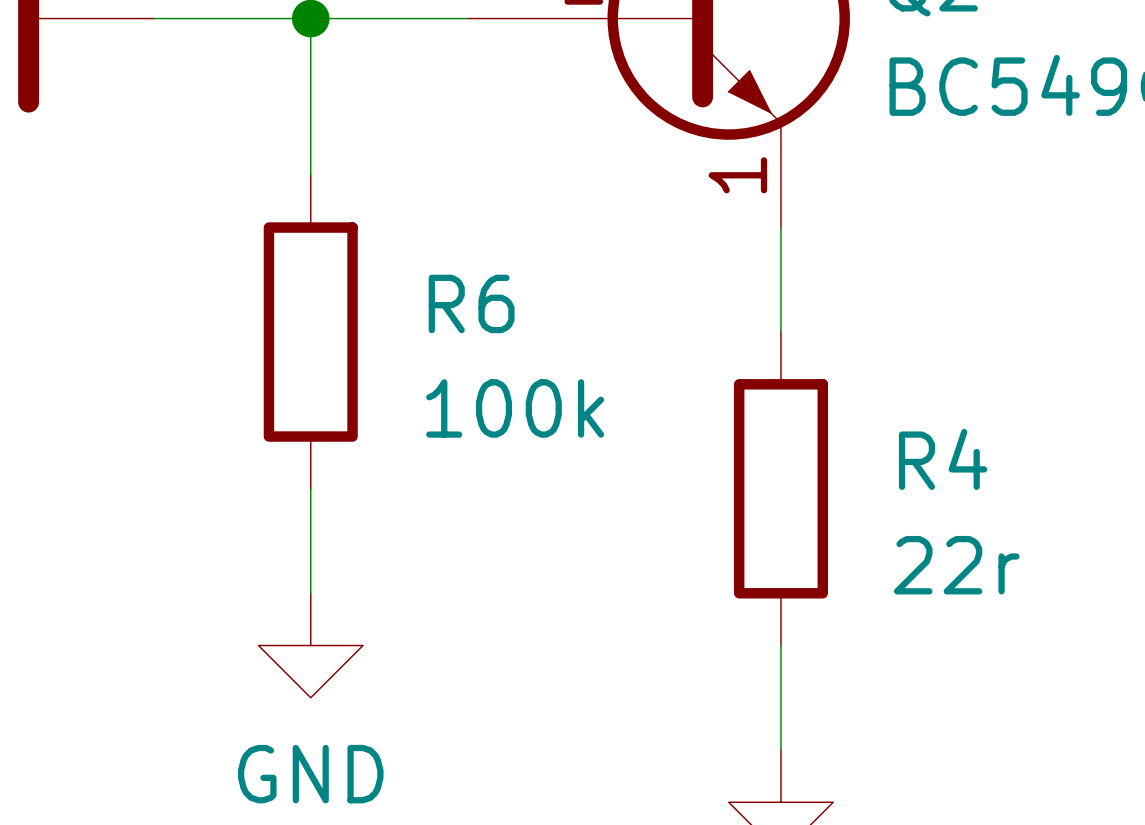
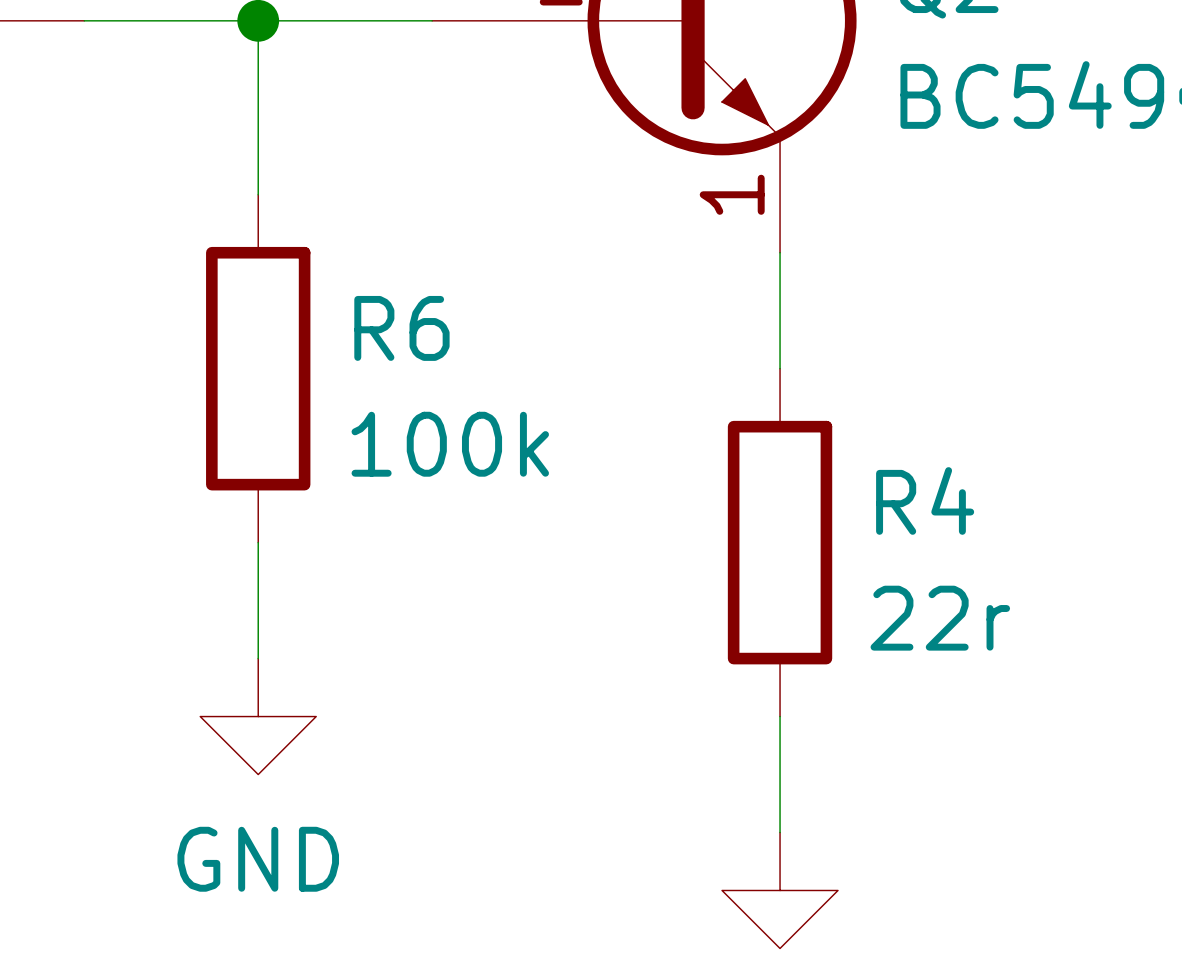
R6 name position: R6 (471, 303) -> R6 (401, 328)
R6 value position: 100k (515, 408) -> 100k (450, 444)
R4 name position: R4 (943, 459) -> R4 (925, 500)
R4 value position: 22r (956, 565) -> 22r (940, 618)

